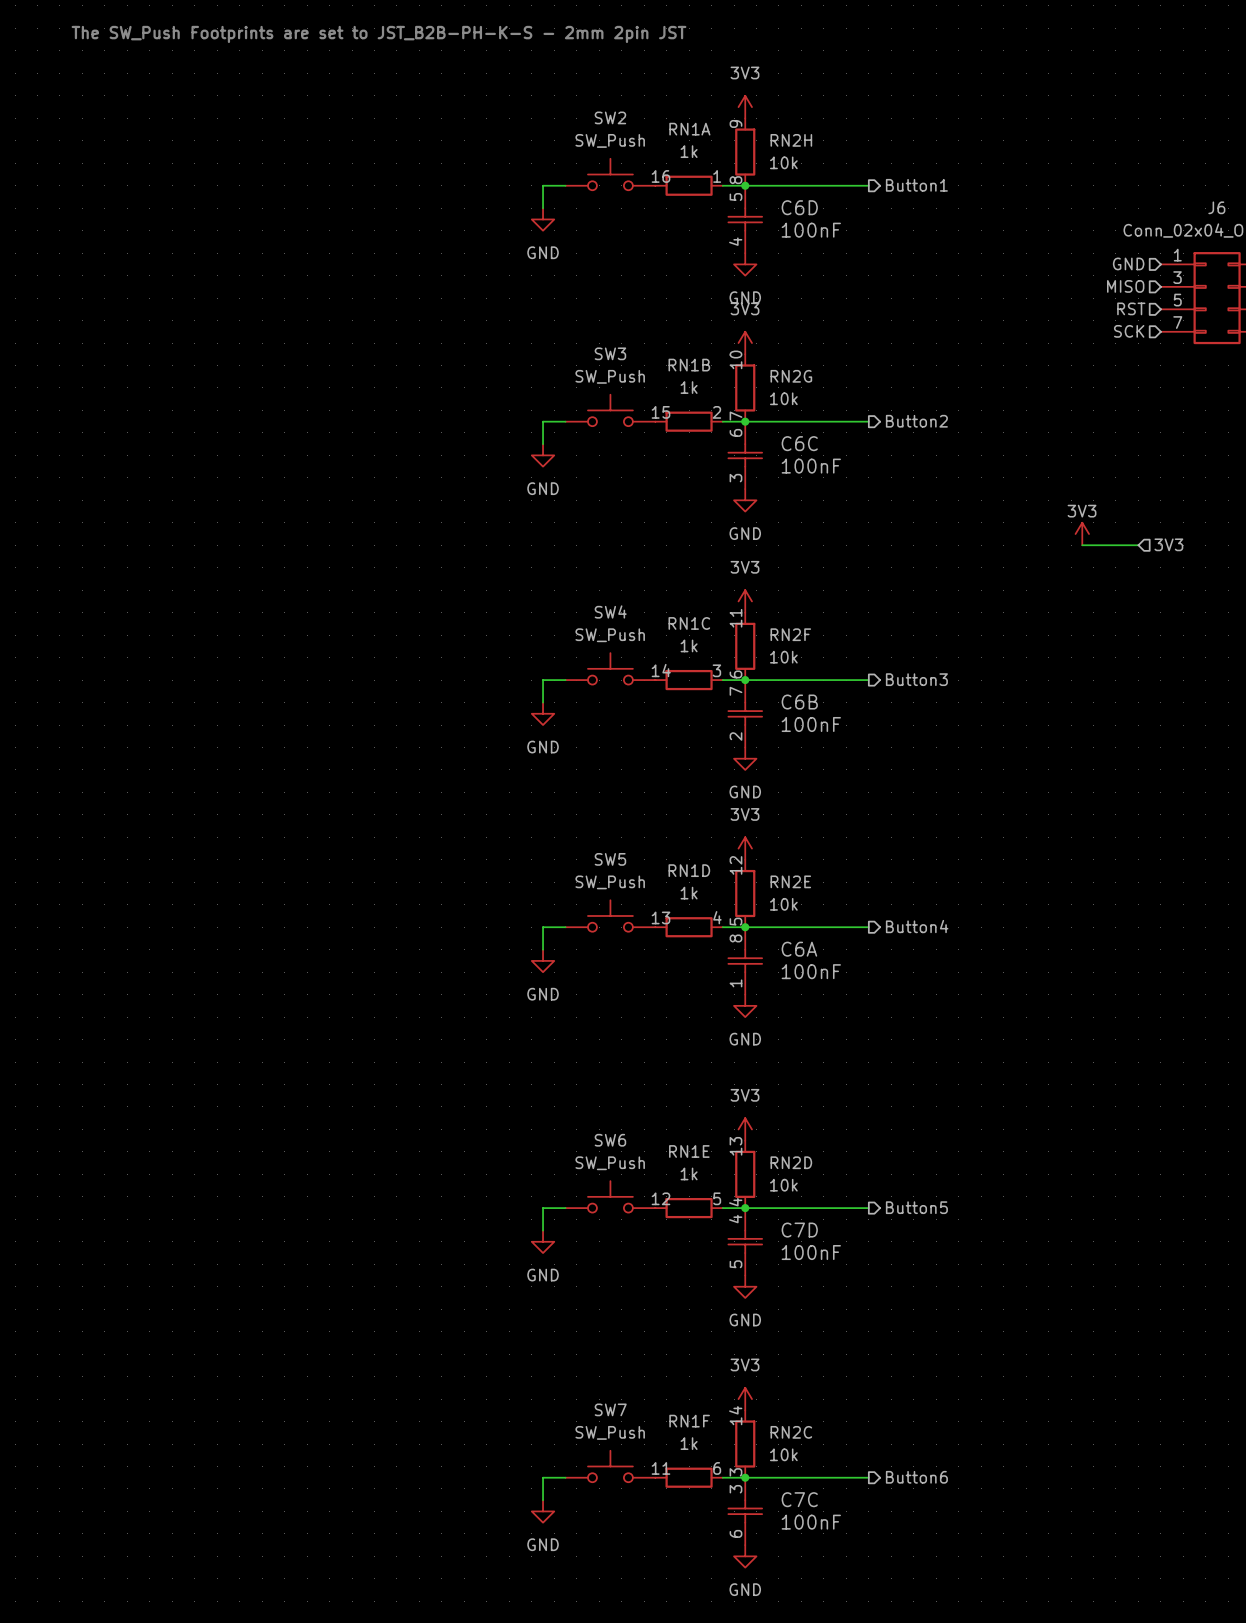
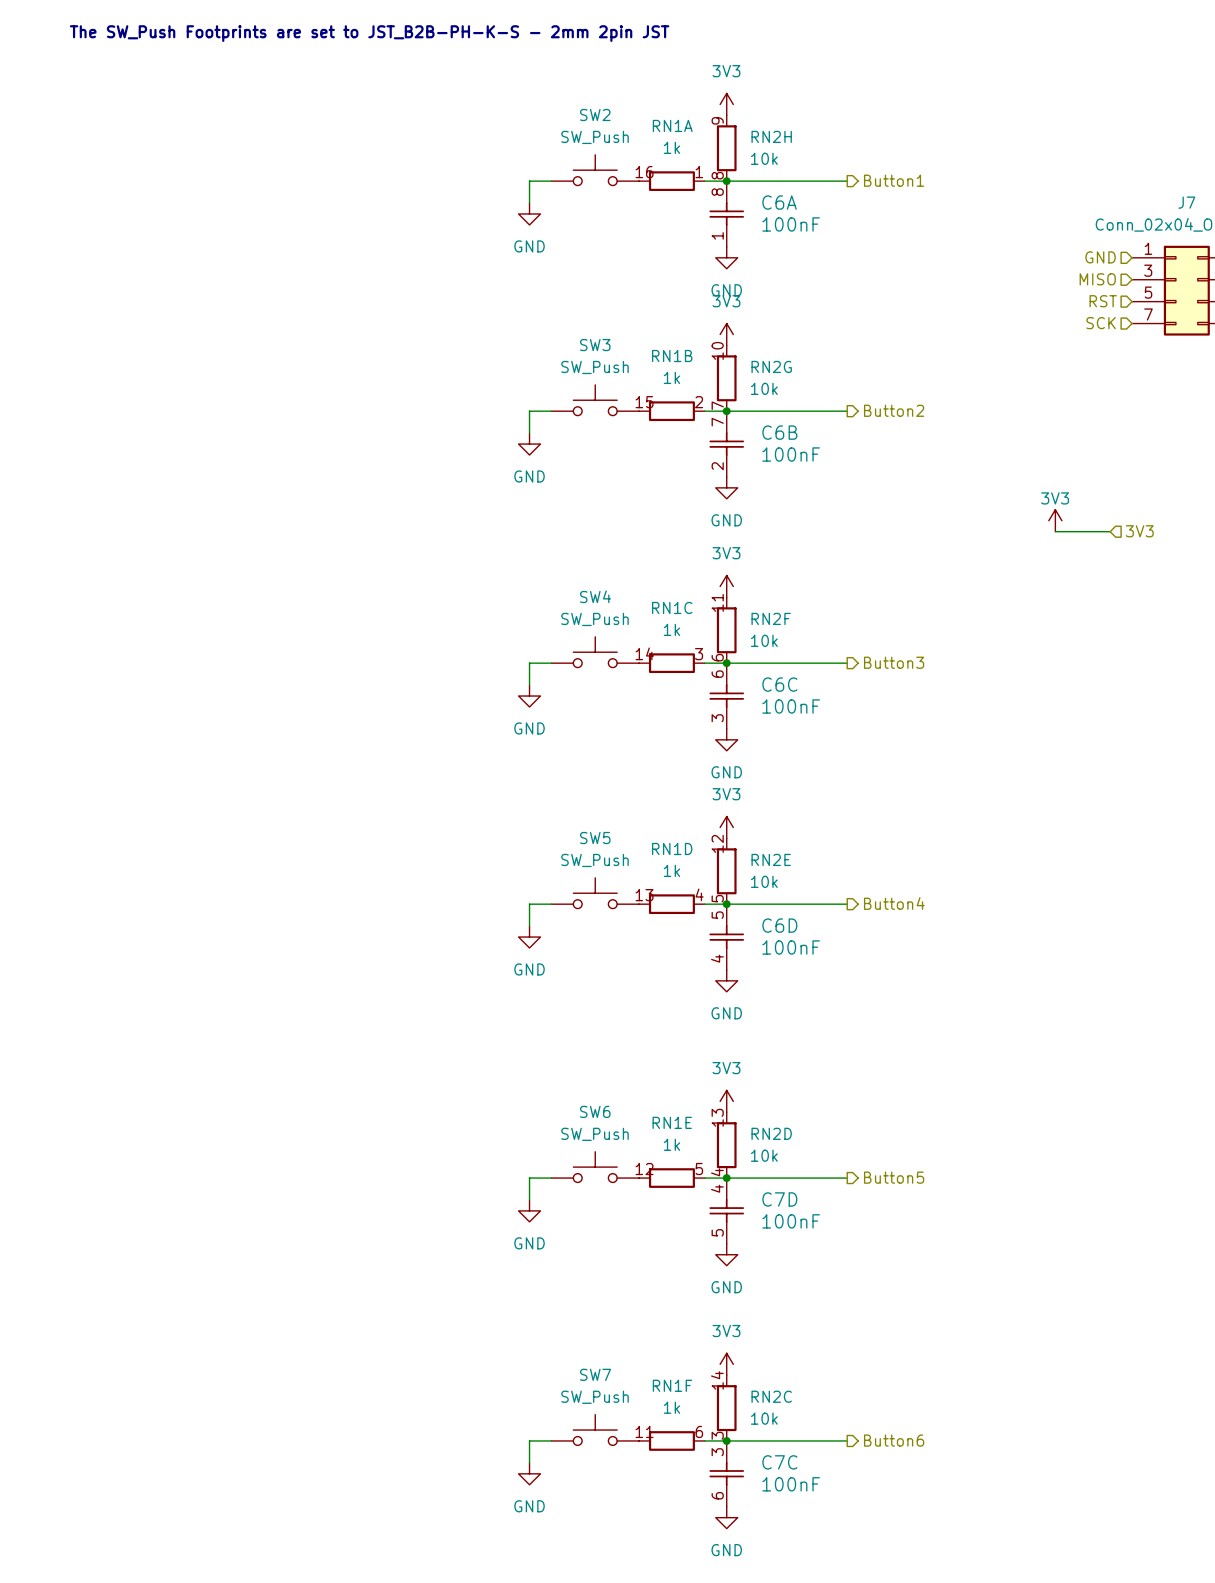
J6 name: J6 (1216, 207) -> J7 (1186, 202)
C6D position: (745, 219) -> (726, 937)
C6C position: (745, 455) -> (726, 696)
C6B position: (745, 713) -> (726, 444)
C6A position: (745, 960) -> (726, 213)

